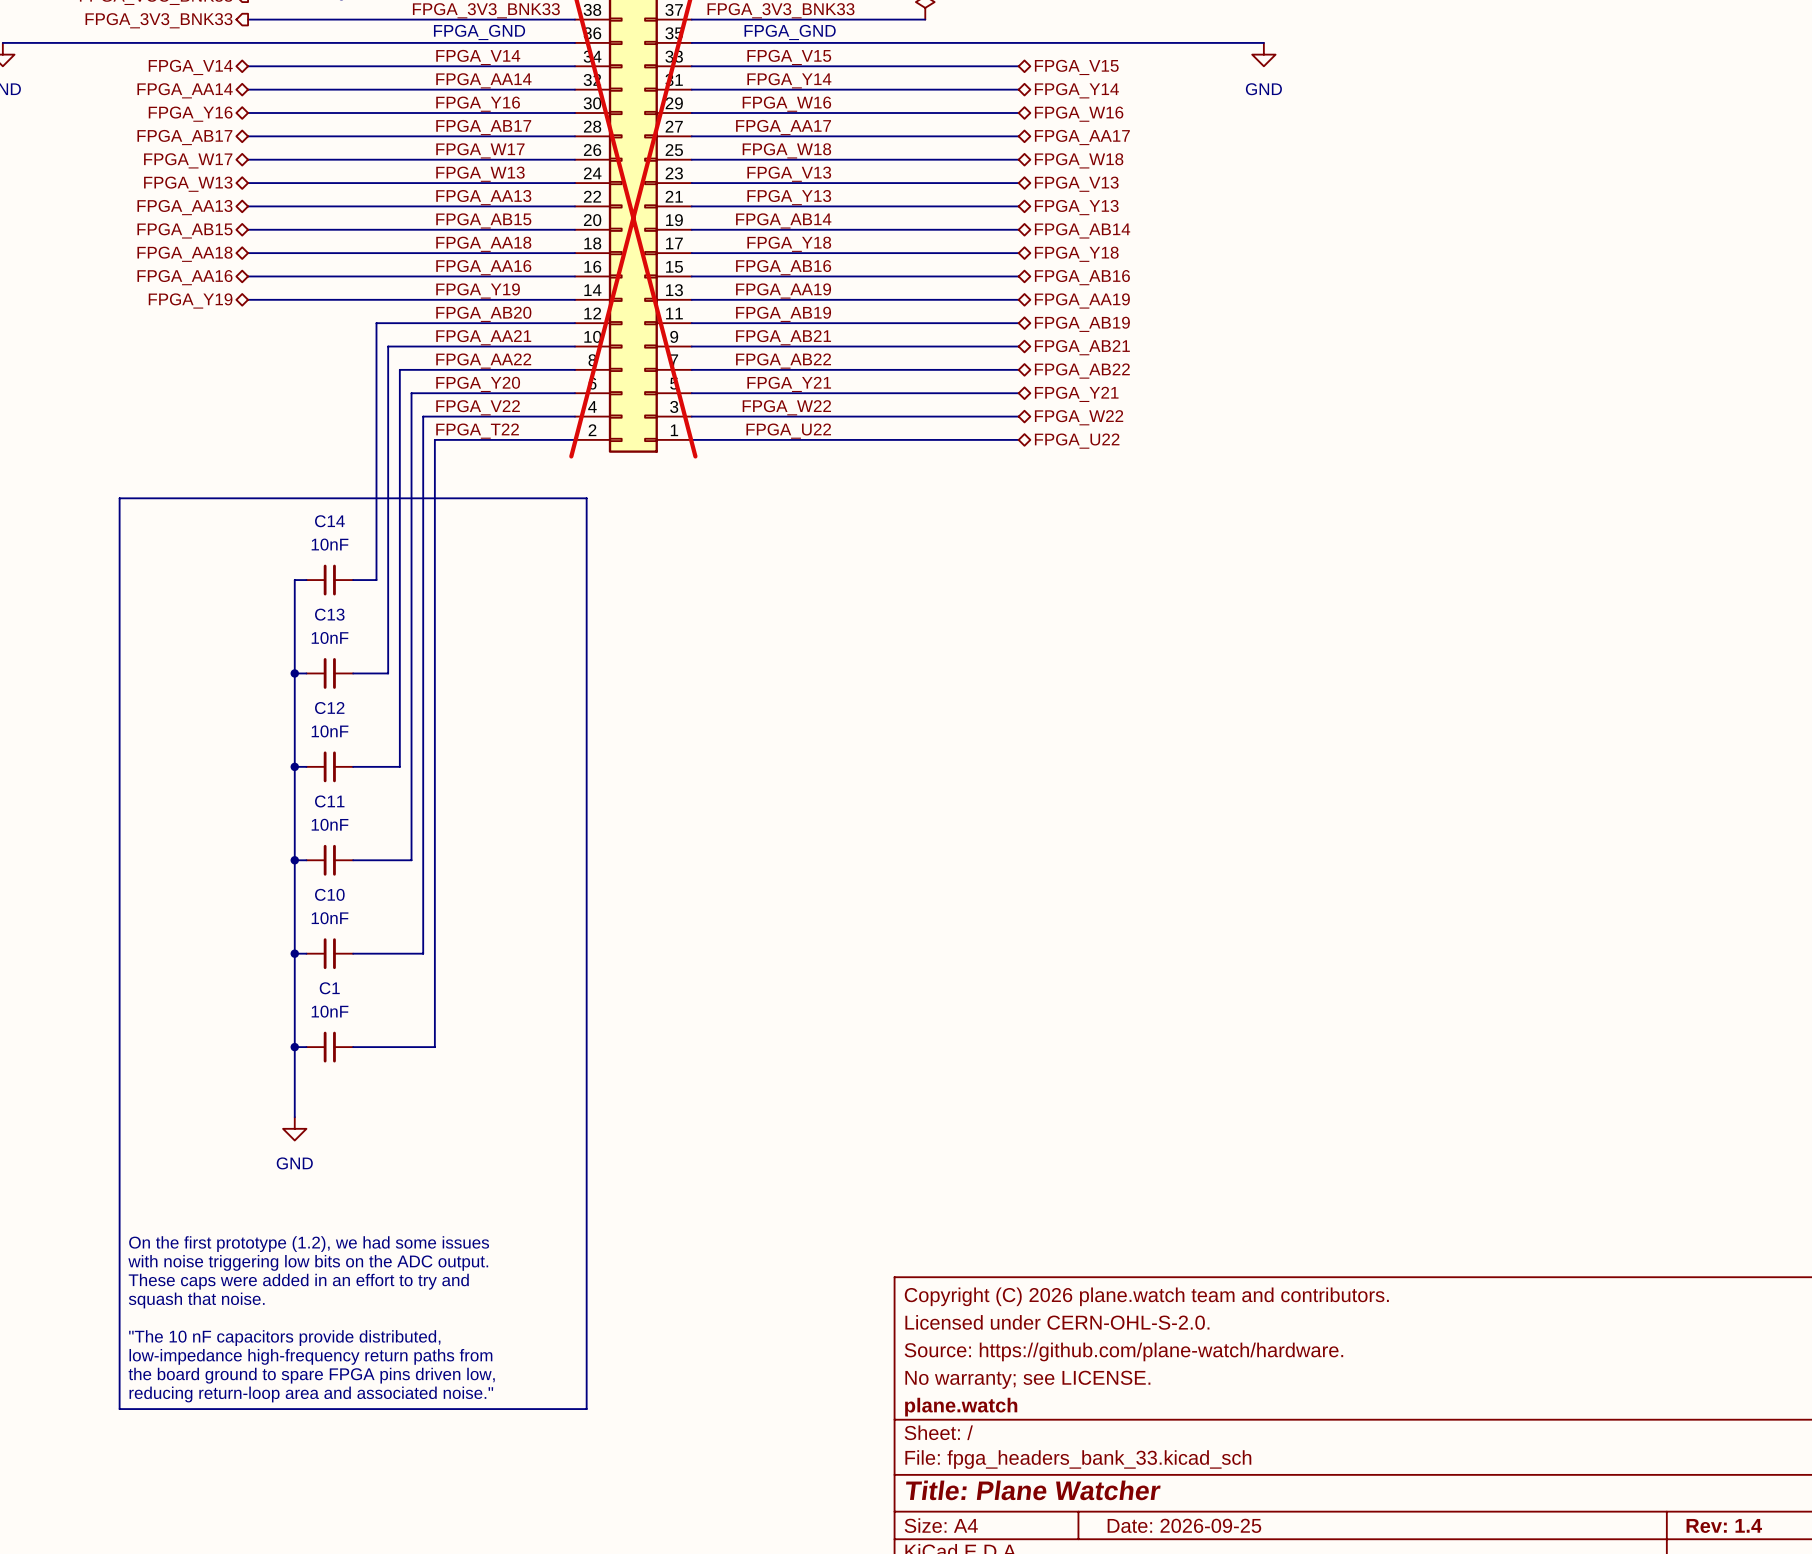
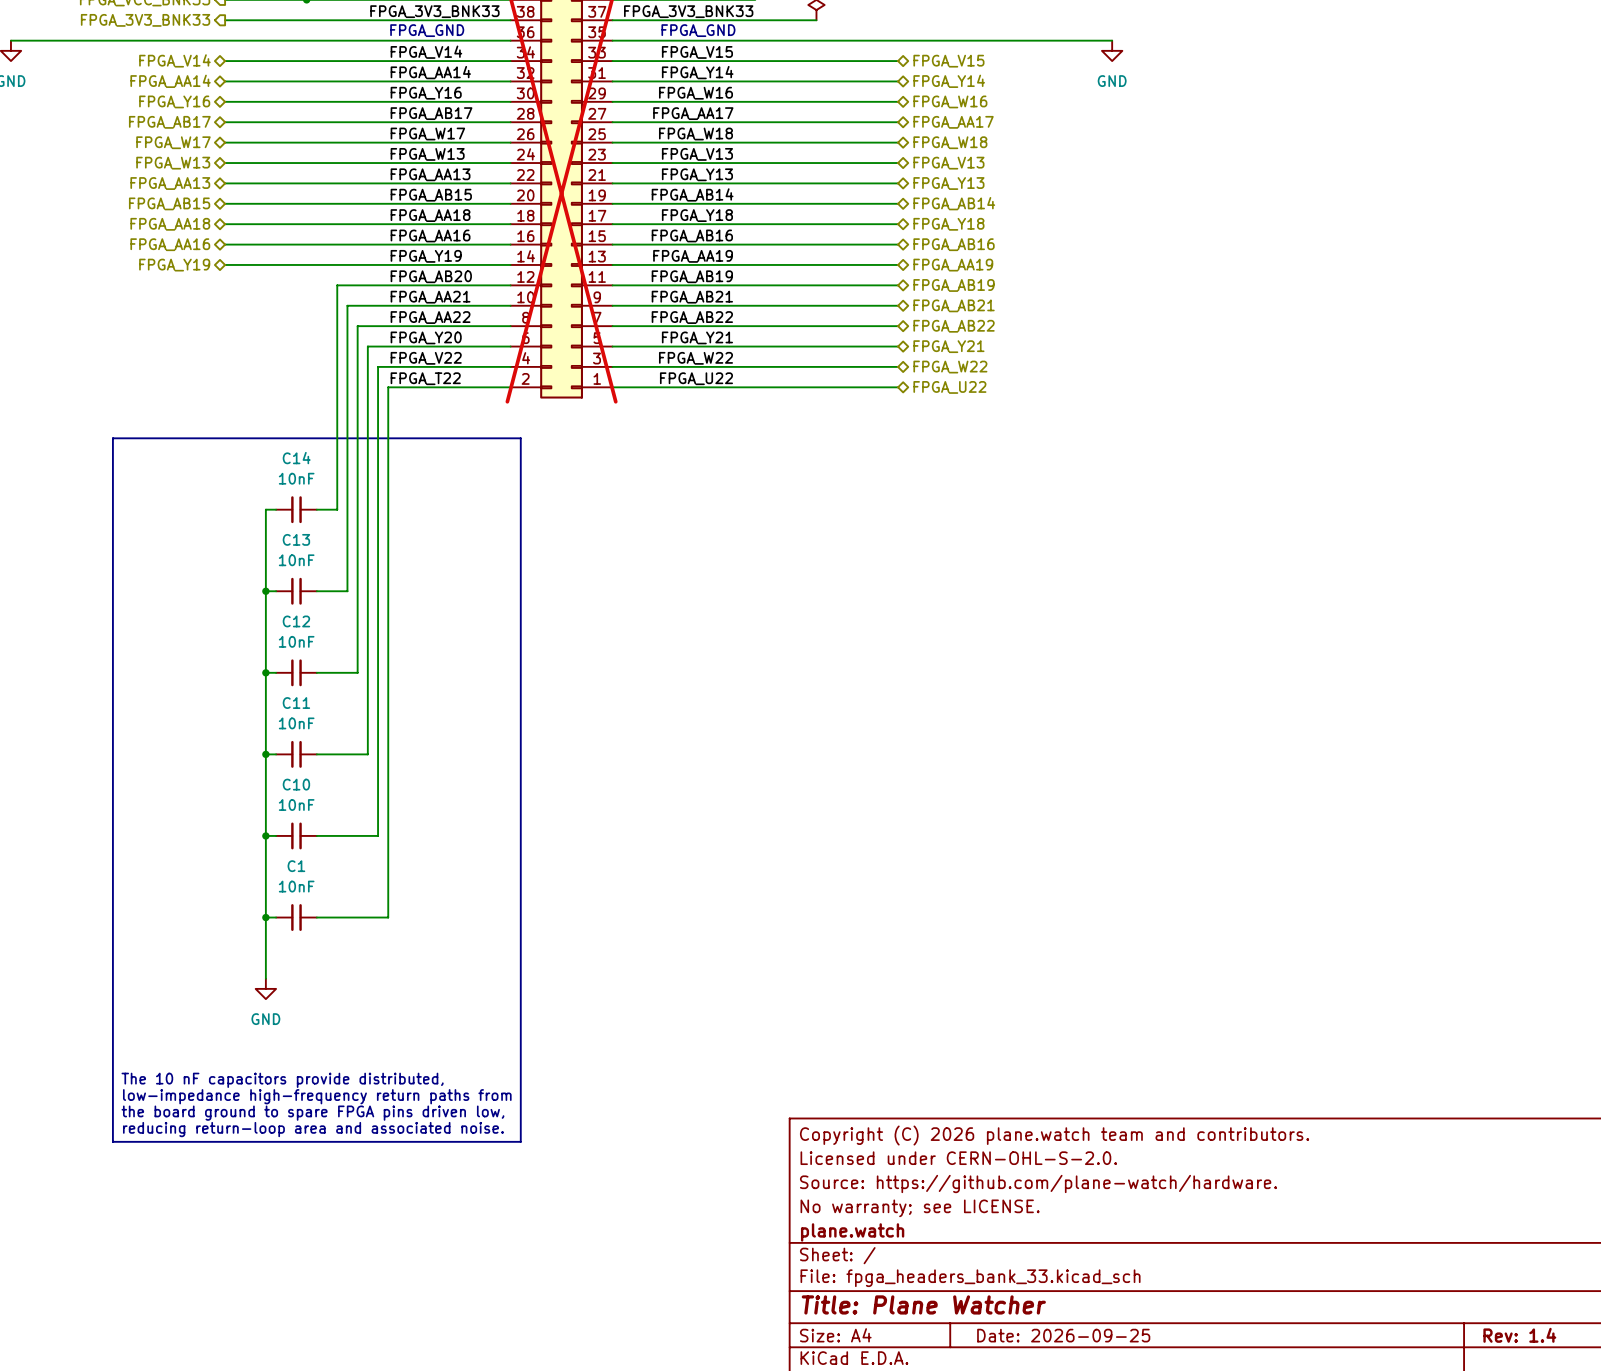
text: none -> The 10 nF capacitors provide distributed, (282, 1080)
text: On the first prototype (1.2), we had some issues (309, 1244) -> none
text: with noise triggering low bits on the ADC output. (308, 1262) -> none
text: These caps were added in an effort to try and (298, 1281) -> none
text: none -> reducing return-loop area and associated noise. (313, 1129)
text: squash that noise. (196, 1300) -> none
line: (119, 1303) (119, 1409) (586, 1409) (586, 1303) -> (112, 1141) (520, 1141)
text: "The 10 nF capacitors provide distributed, (284, 1338) -> none
text position: low-impedance high-frequency return paths from (310, 1356) -> low-impedance high-frequency return paths from (317, 1096)
text position: the board ground to spare FPGA pins driven low, (311, 1375) -> the board ground to spare FPGA pins driven low, (312, 1113)
text: reducing return-loop area and associated noise." (311, 1394) -> none

